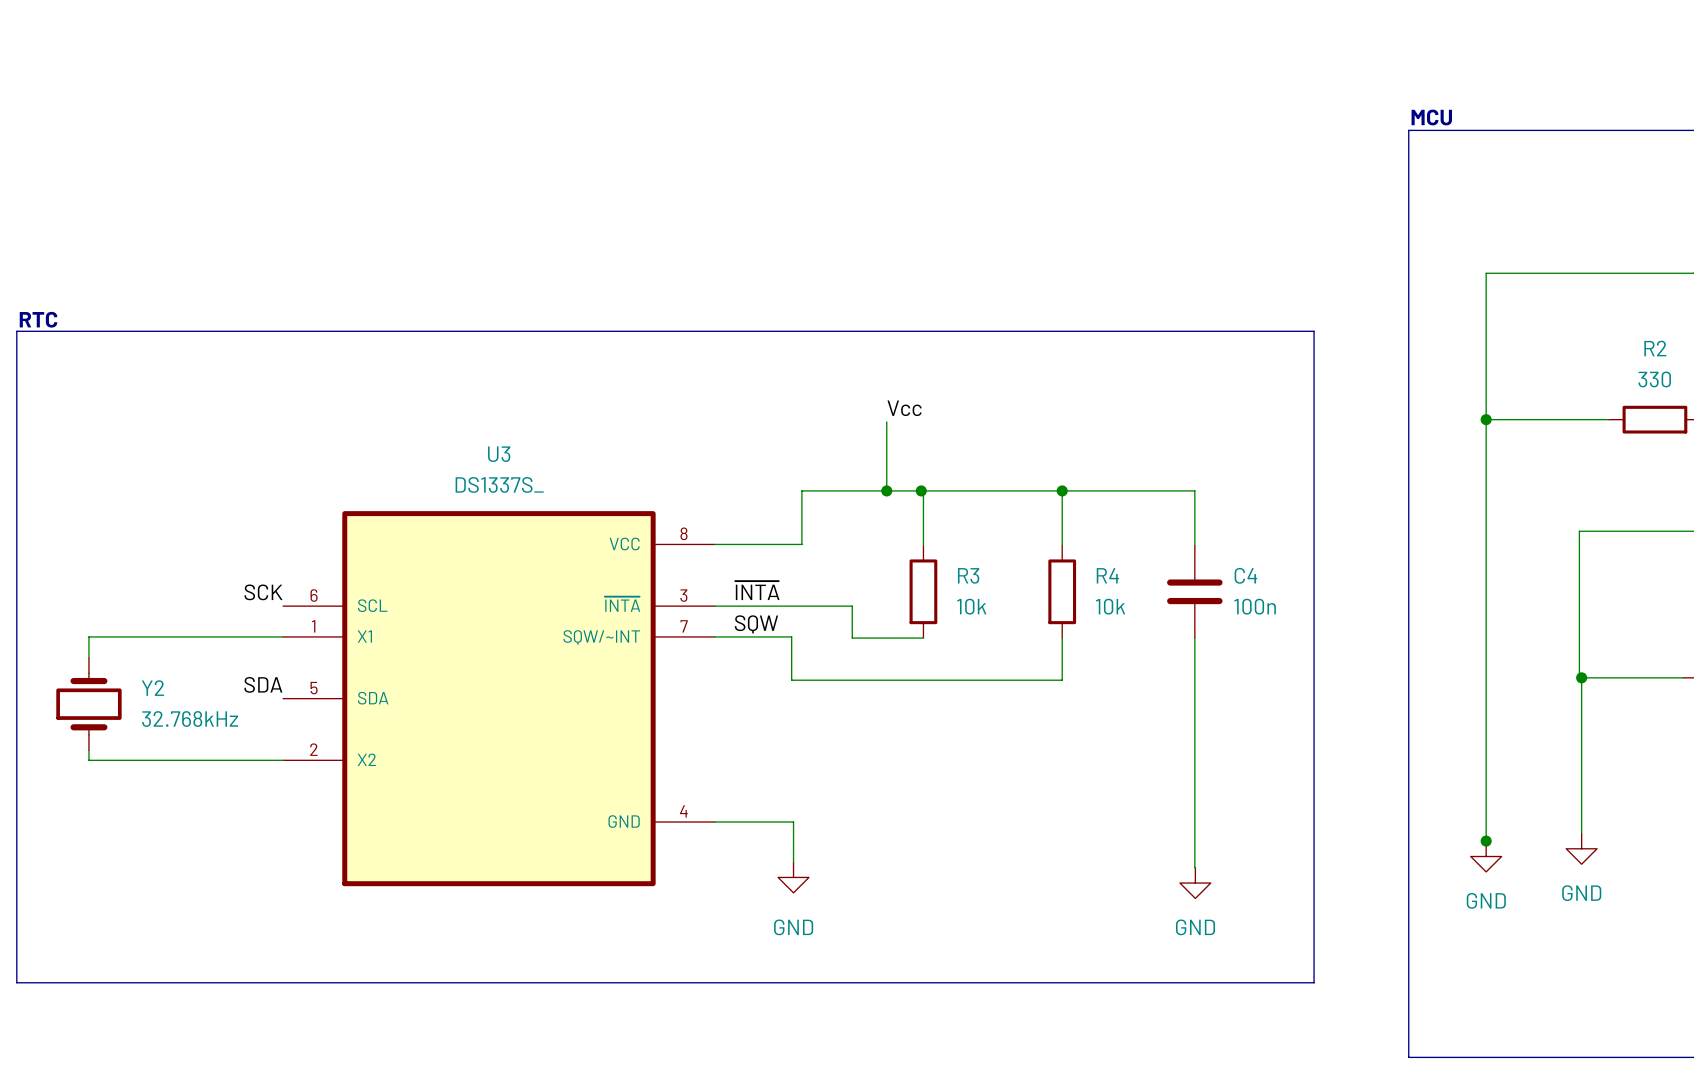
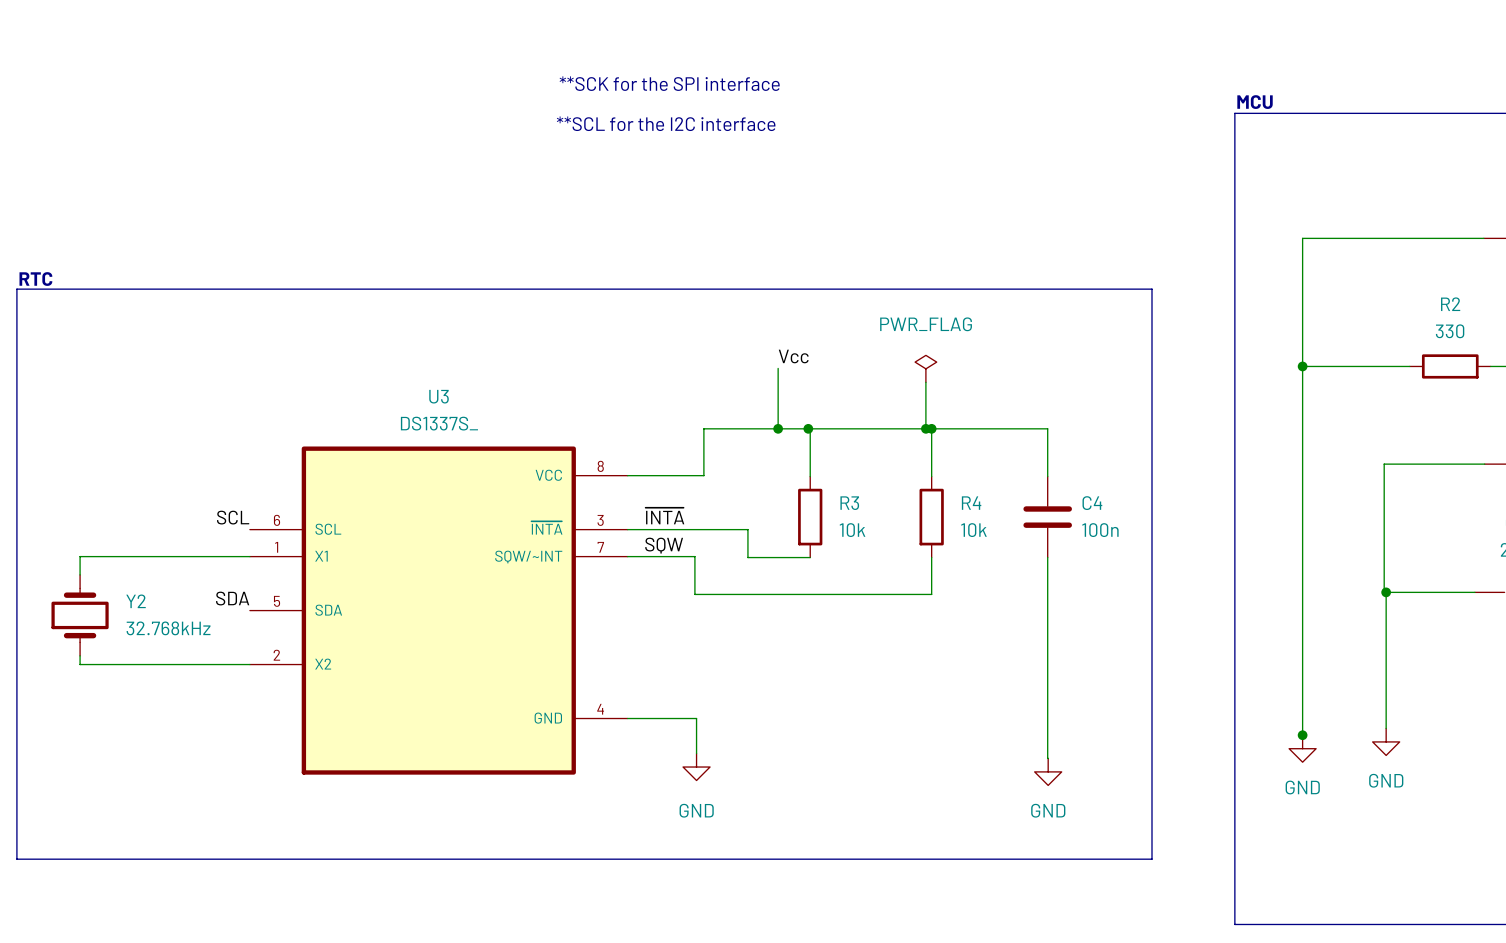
text: none -> **SCK for the SPI interface (669, 83)
text: none -> **SCL for the I2C interface (666, 123)
power symbol: none -> PWR_FLAG (925, 368)
wire: none -> (925, 382) (925, 428)
junction: none -> (925, 428)
label: SCK (263, 592) -> SCL (233, 517)

